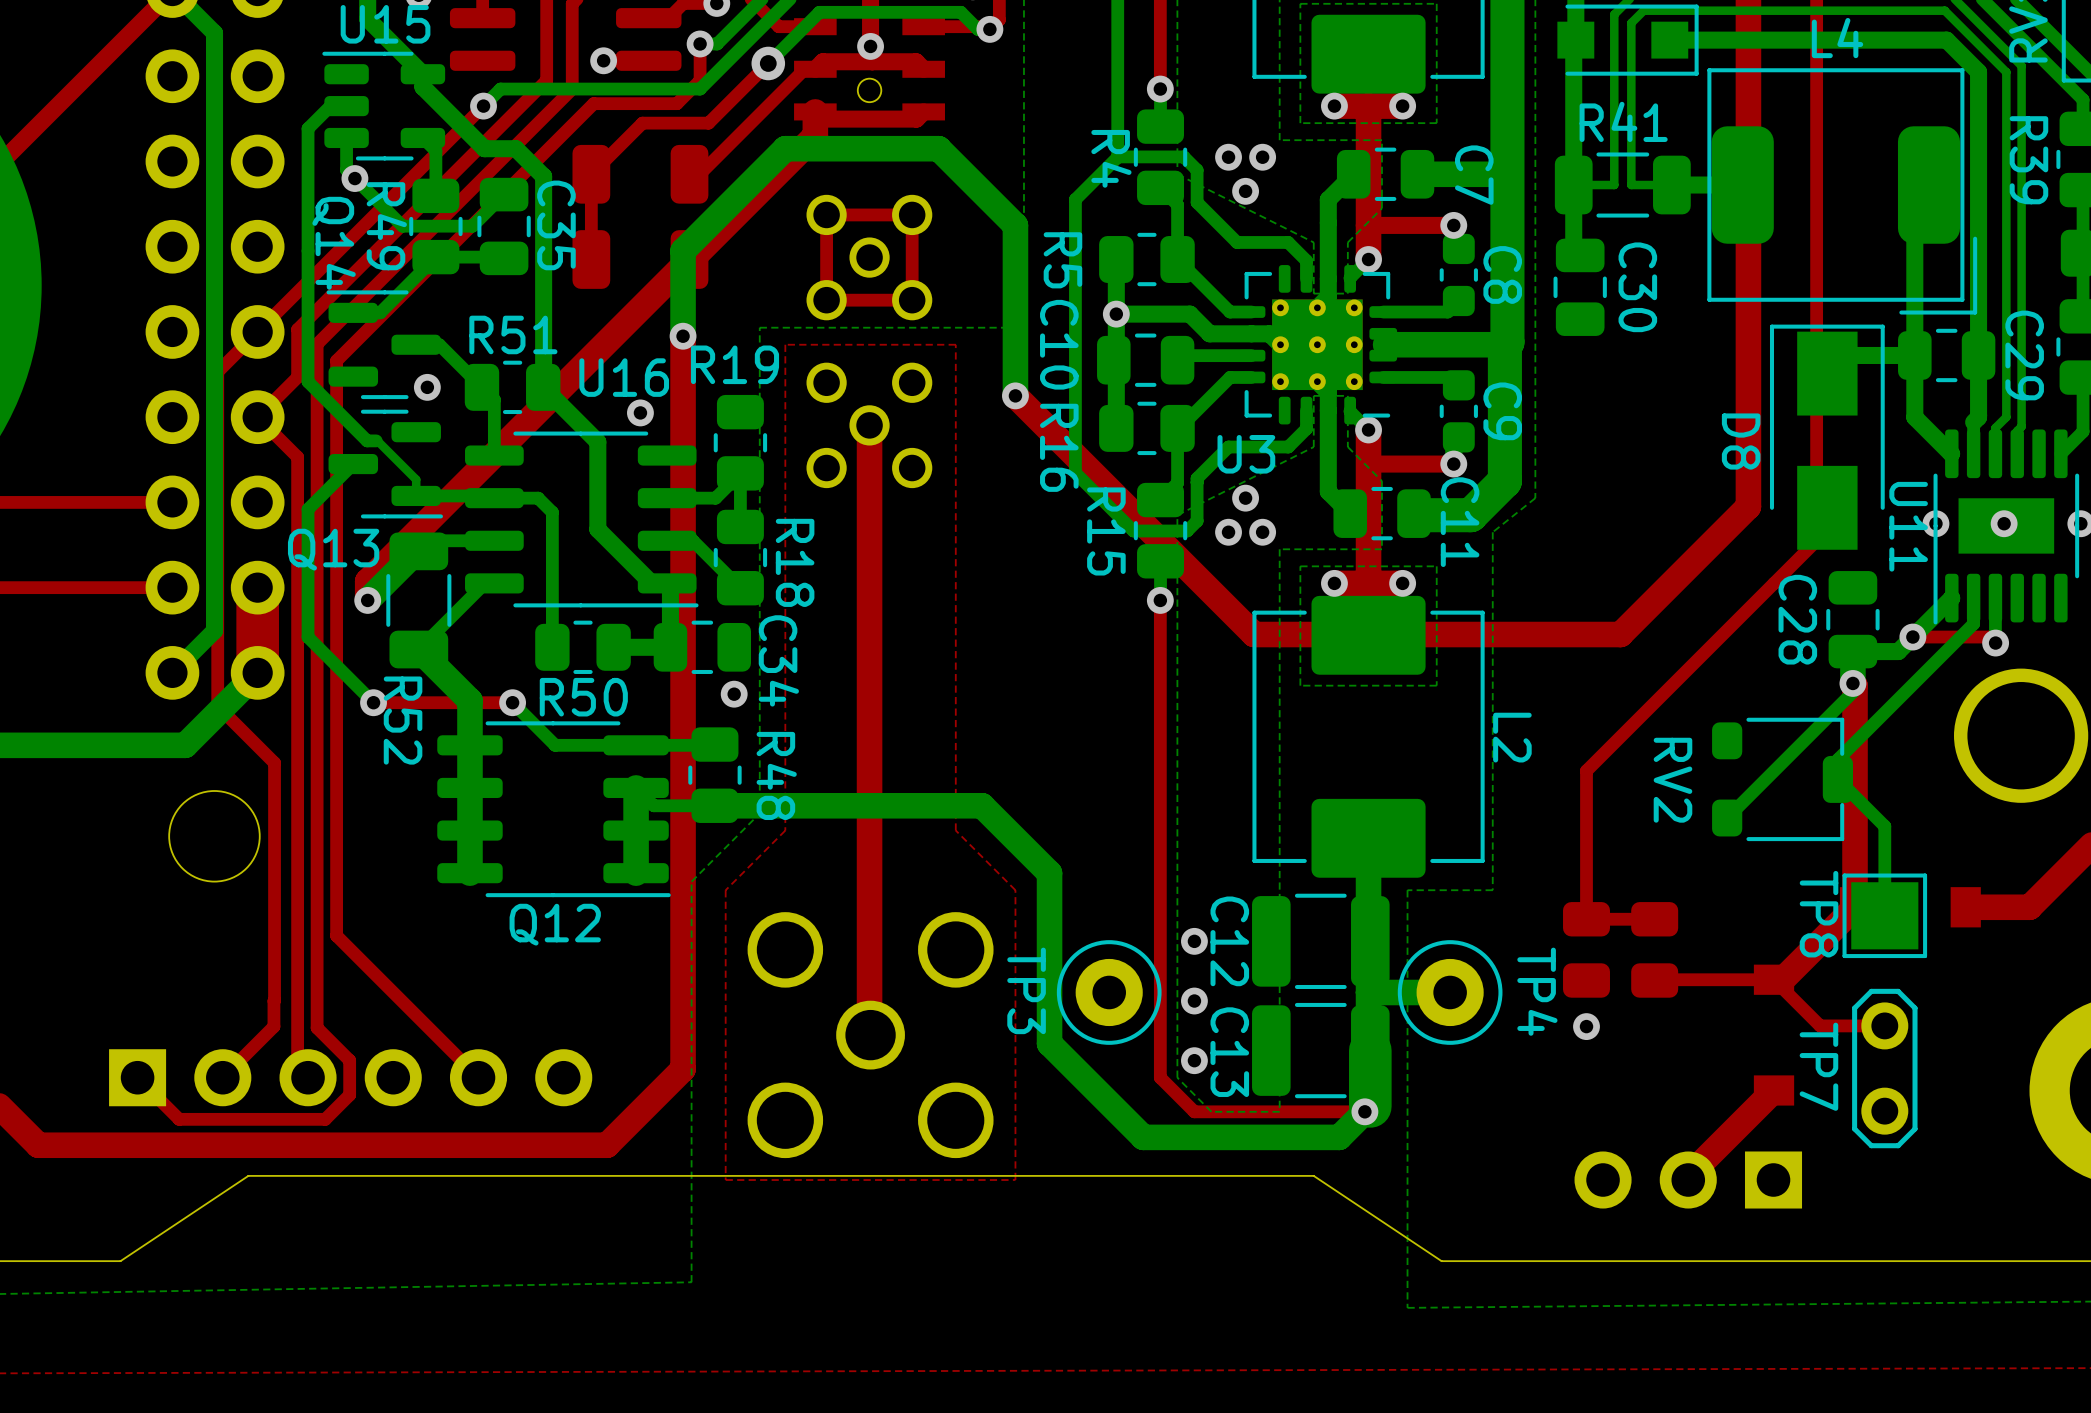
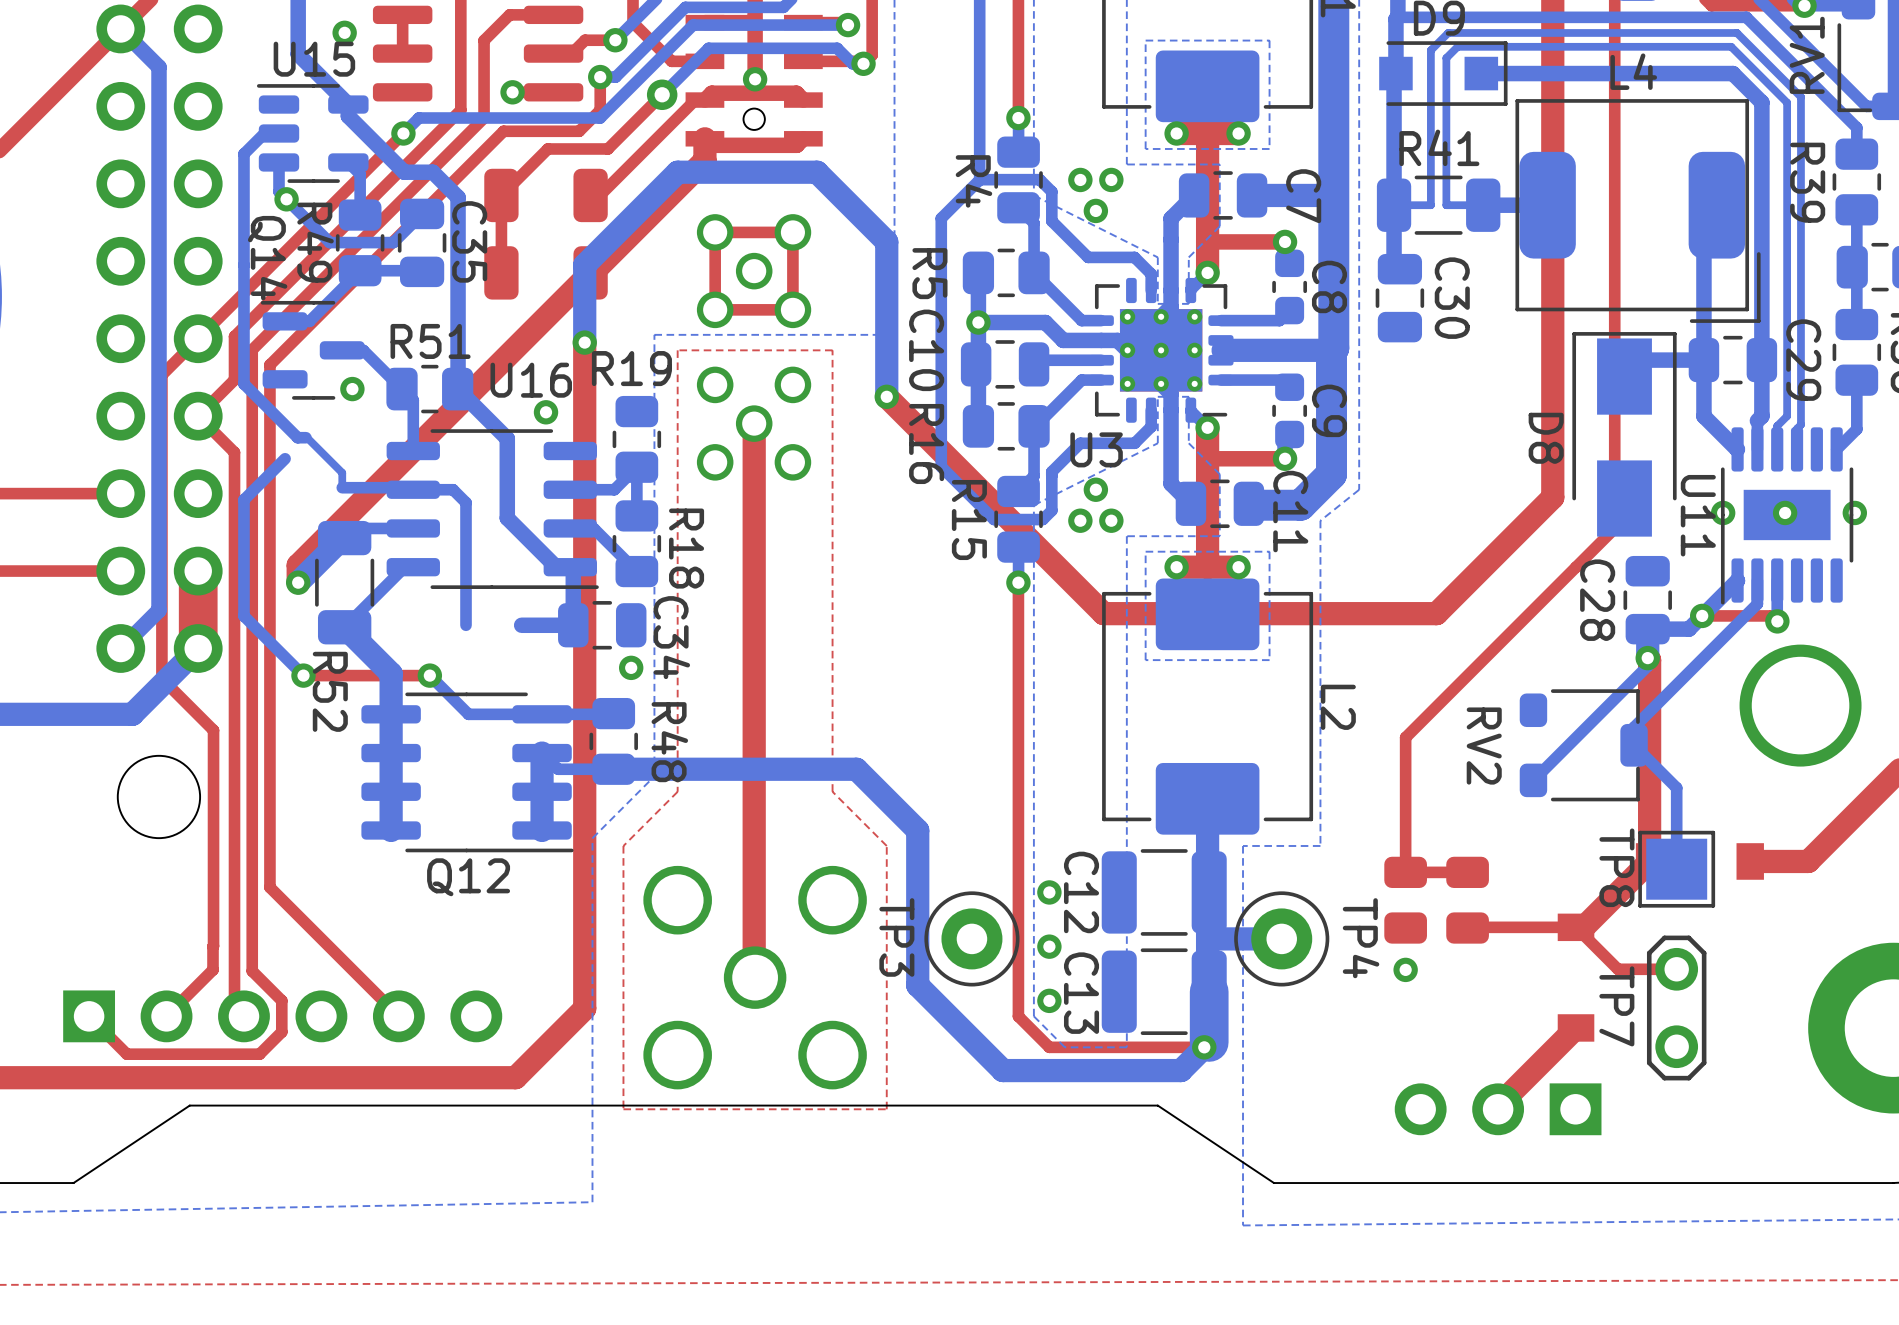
Q13: (385, 464) -> none
R50: (583, 647) -> none

